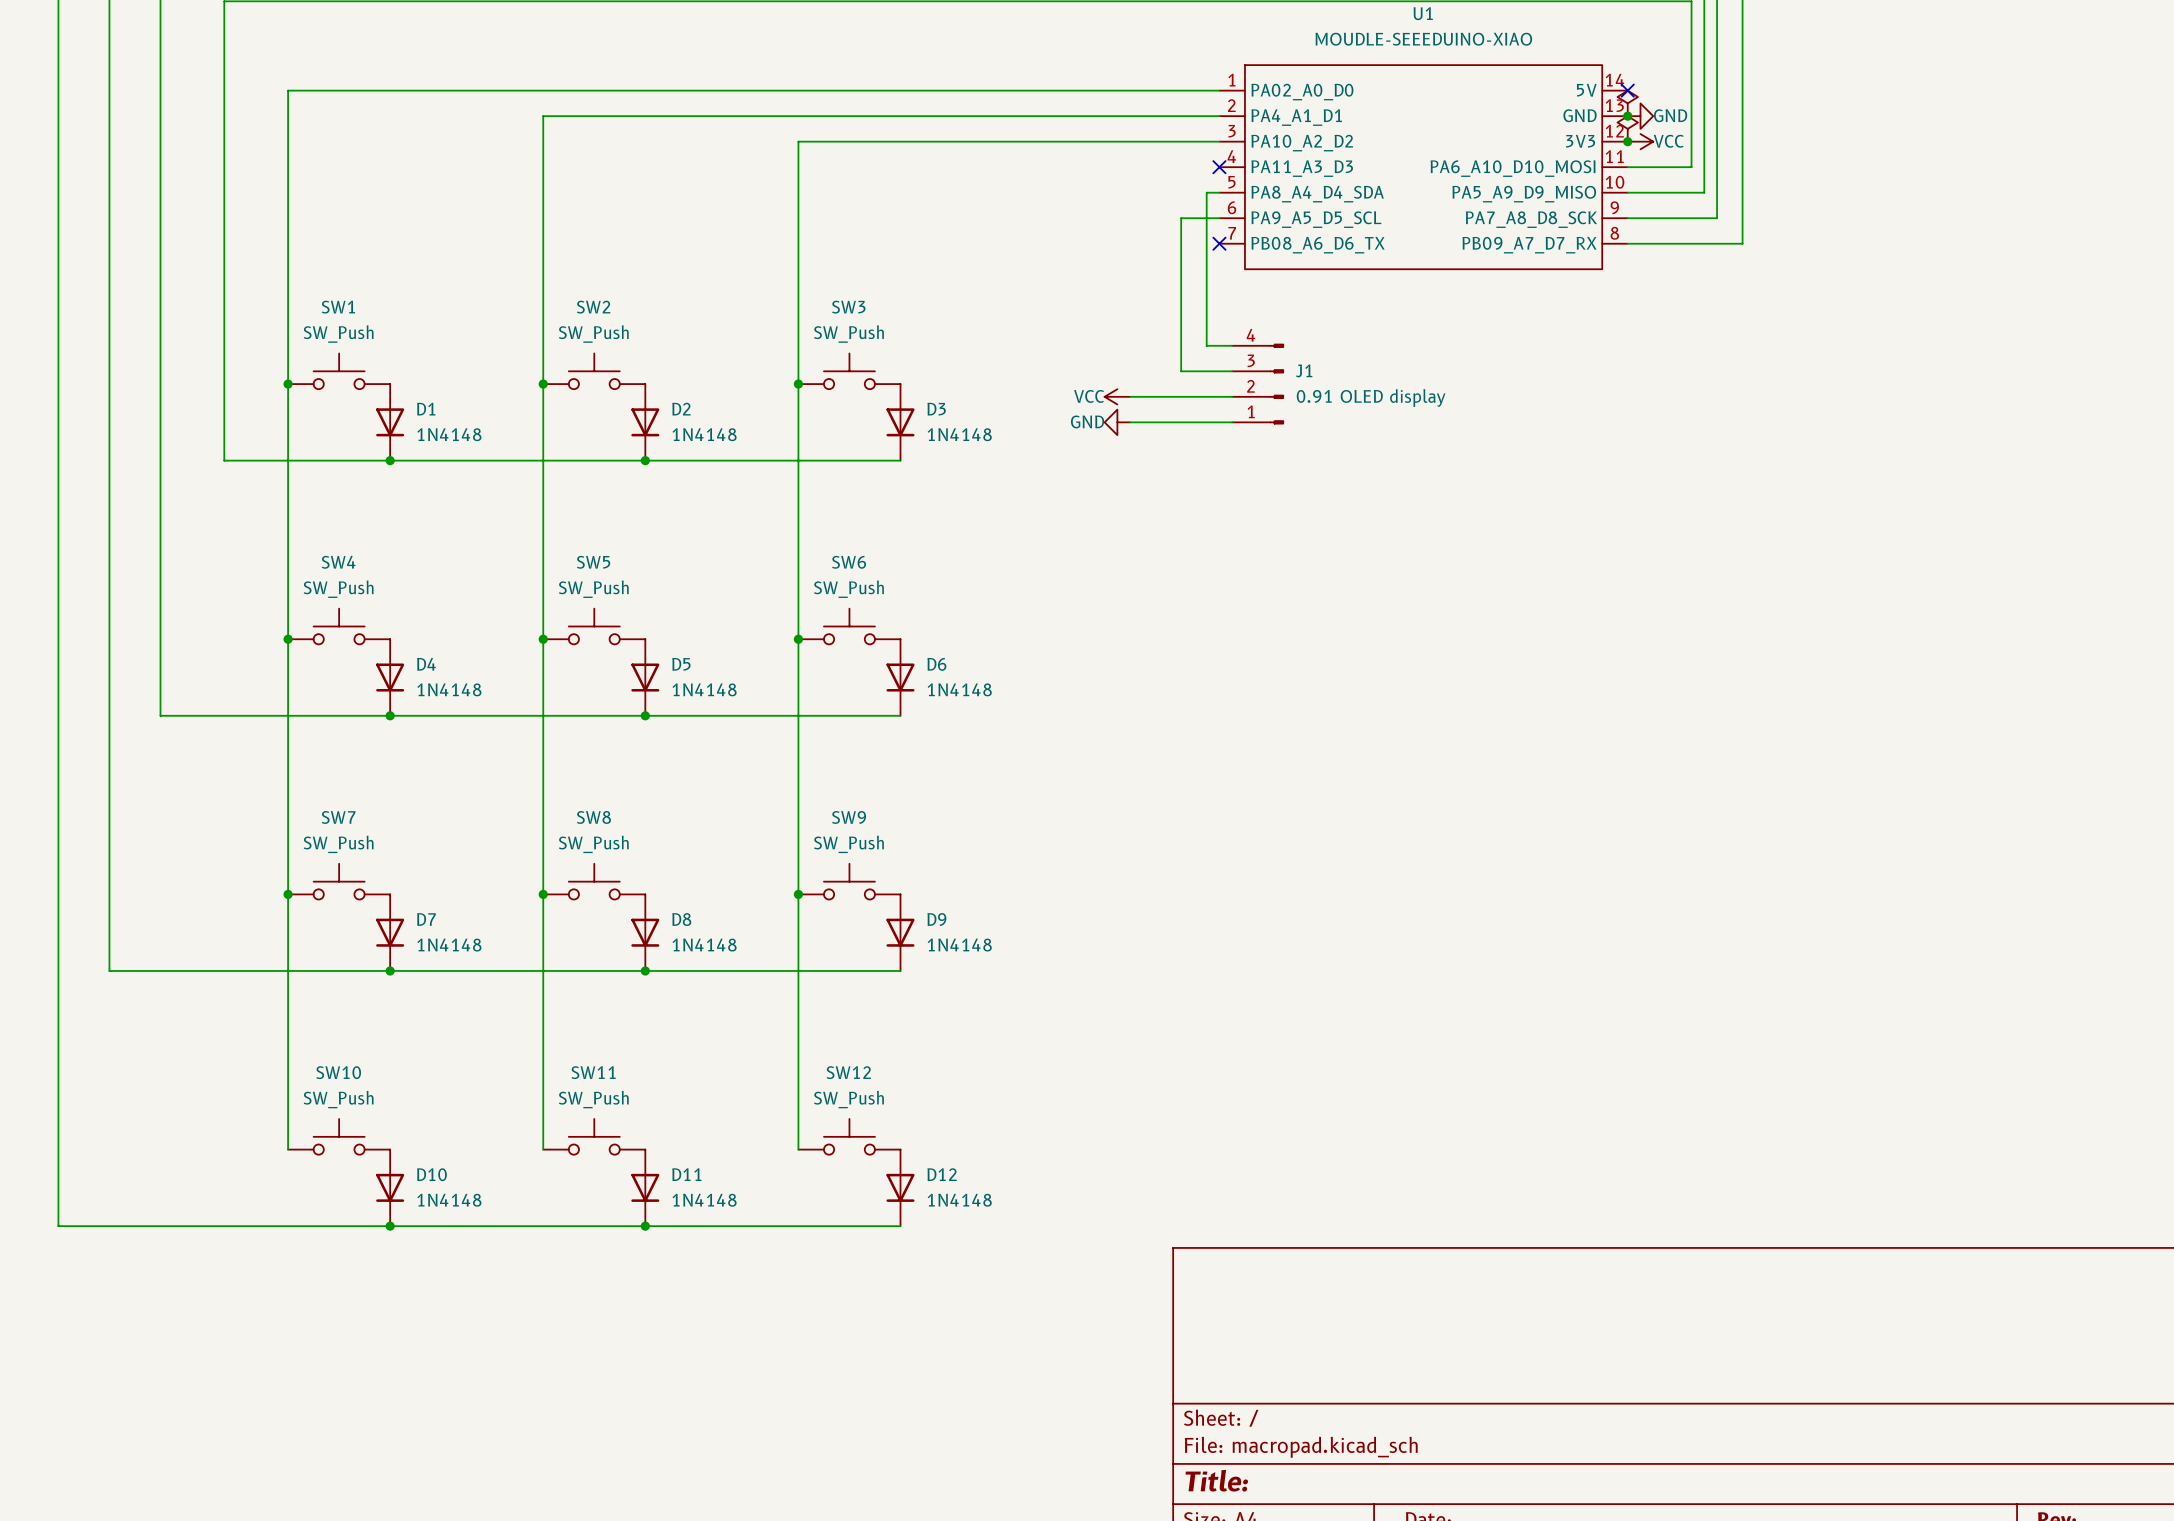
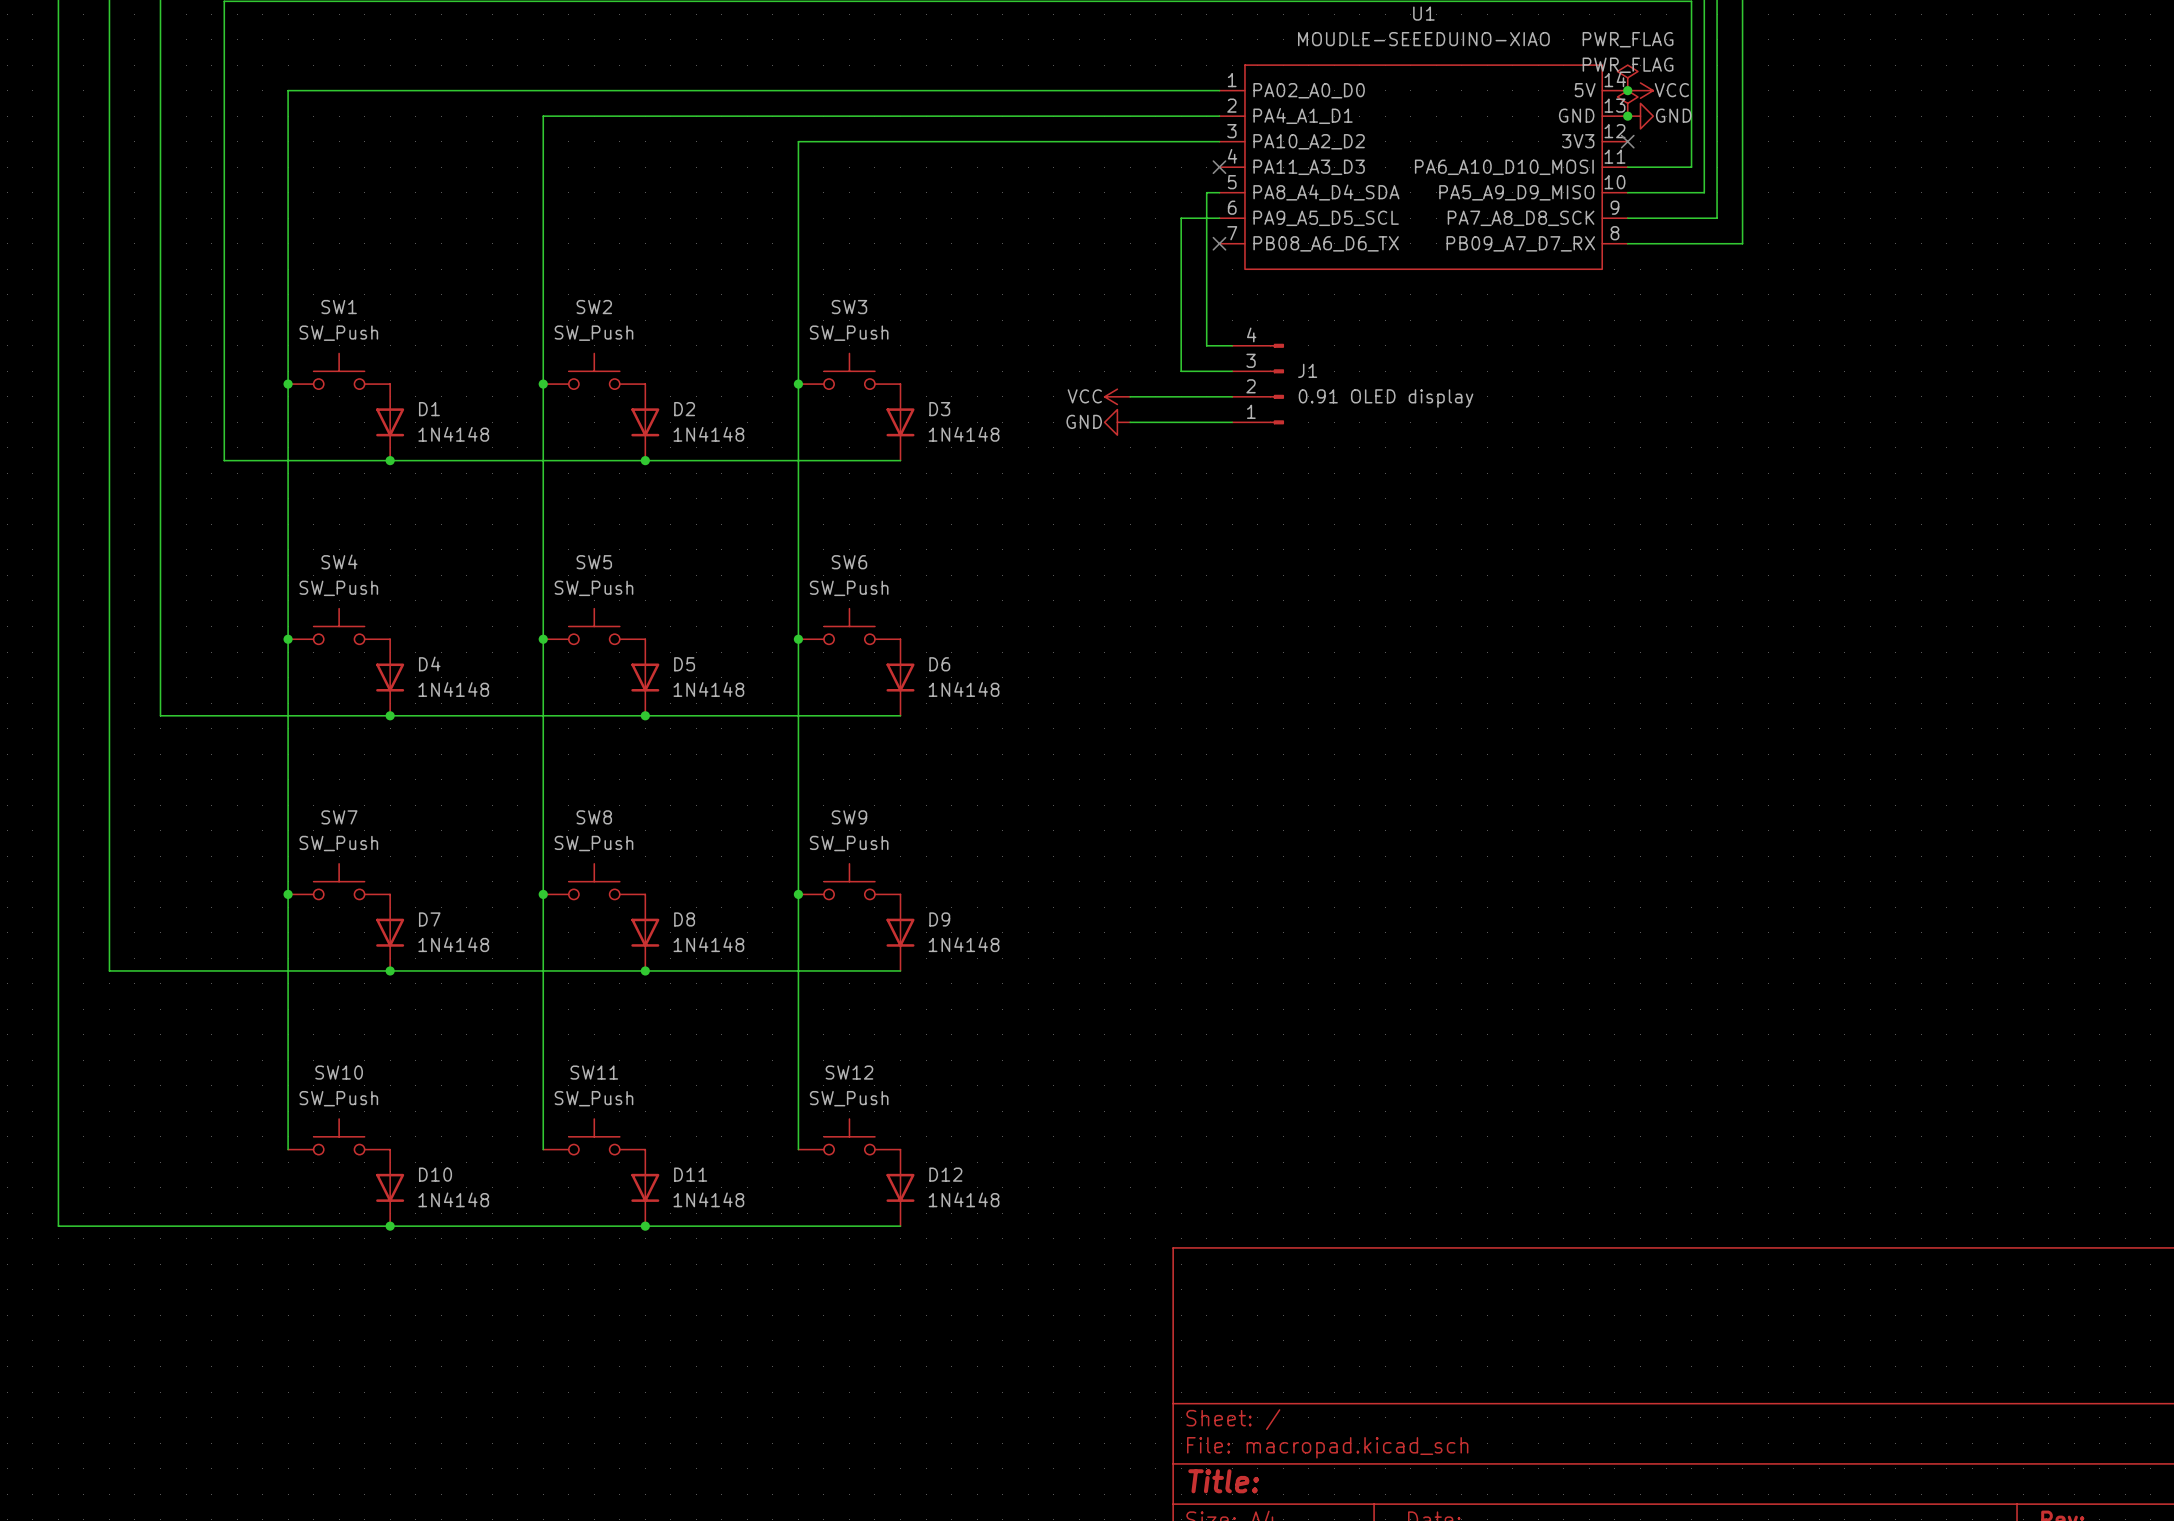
power symbol text: none -> PWR_FLAG (1628, 65)
power symbol: none -> PWR_FLAG (1627, 77)
no-connect mark position: (1627, 90) -> (1627, 141)
power symbol: (1627, 128) -> none
junction position: (1627, 141) -> (1627, 90)
power symbol position: VCC (1640, 141) -> VCC (1640, 90)

